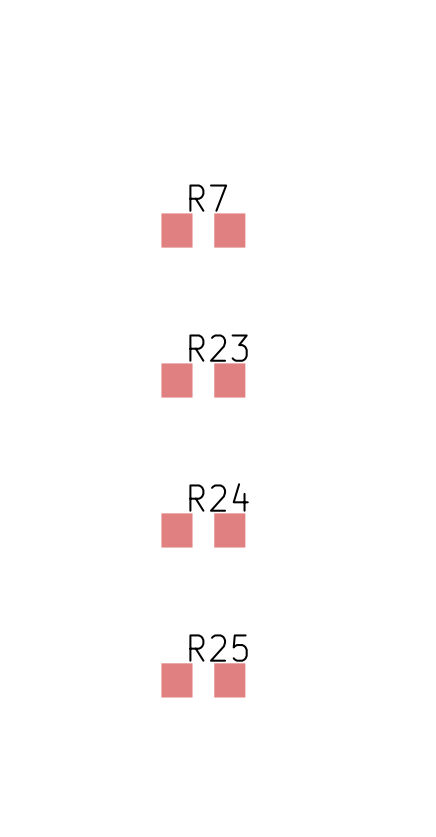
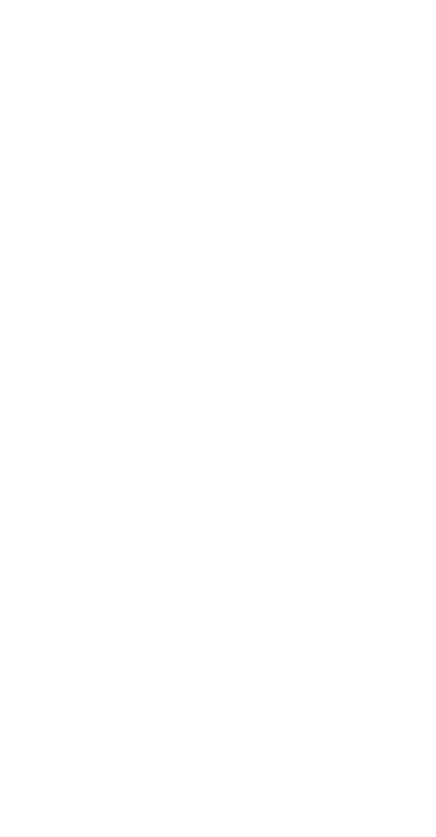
R7: (203, 230) -> none
R23: (203, 380) -> none
R24: (203, 530) -> none
R25: (203, 680) -> none

